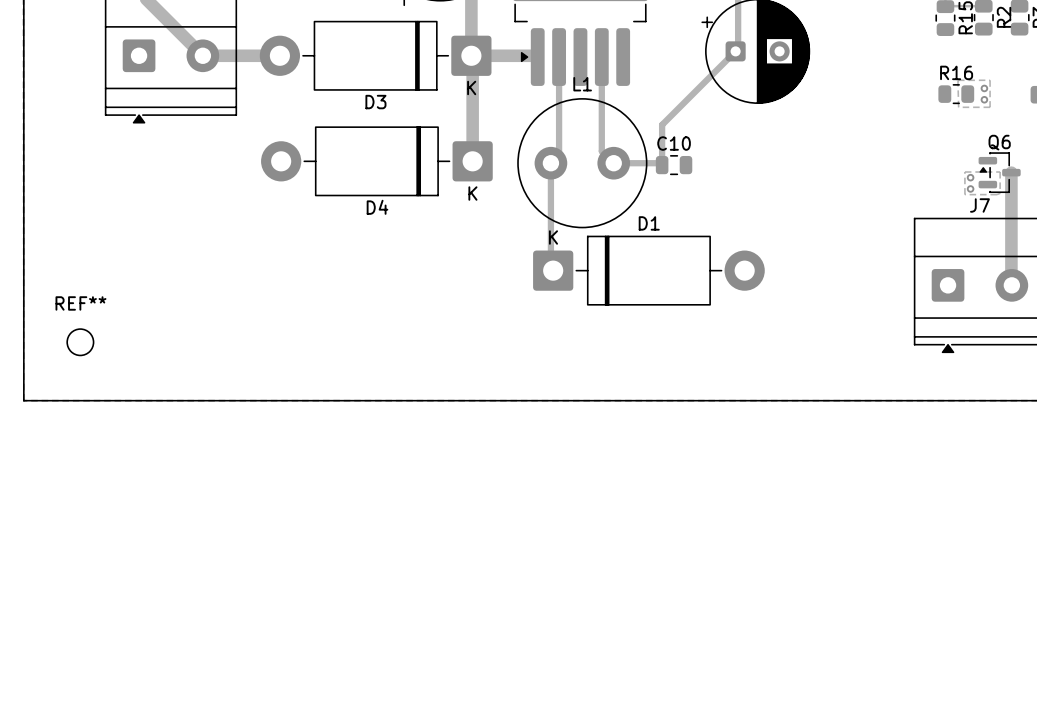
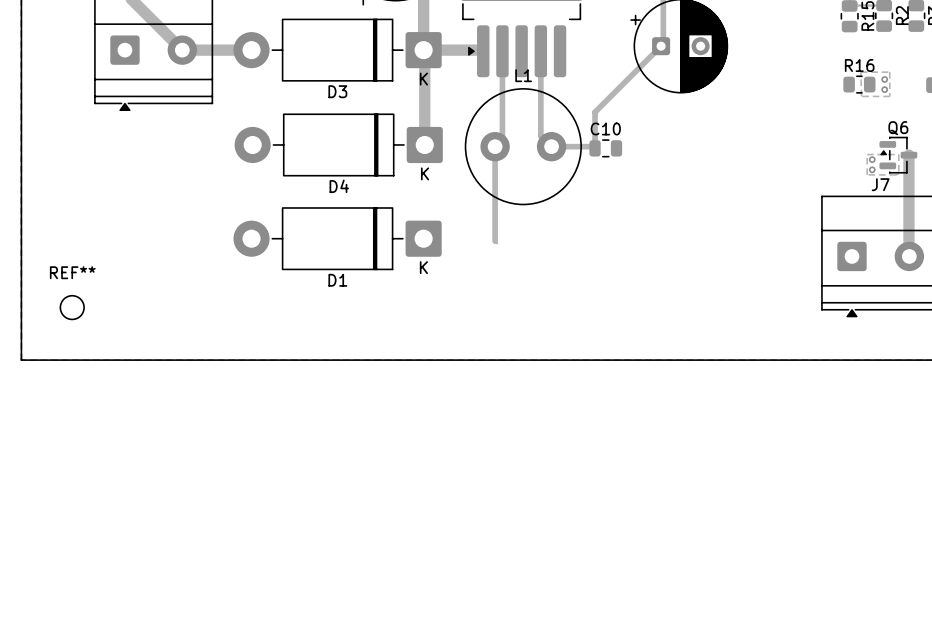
D1 rotation: 0° (648, 270) -> 180° (337, 238)
D1 position: (648, 270) -> (337, 238)

